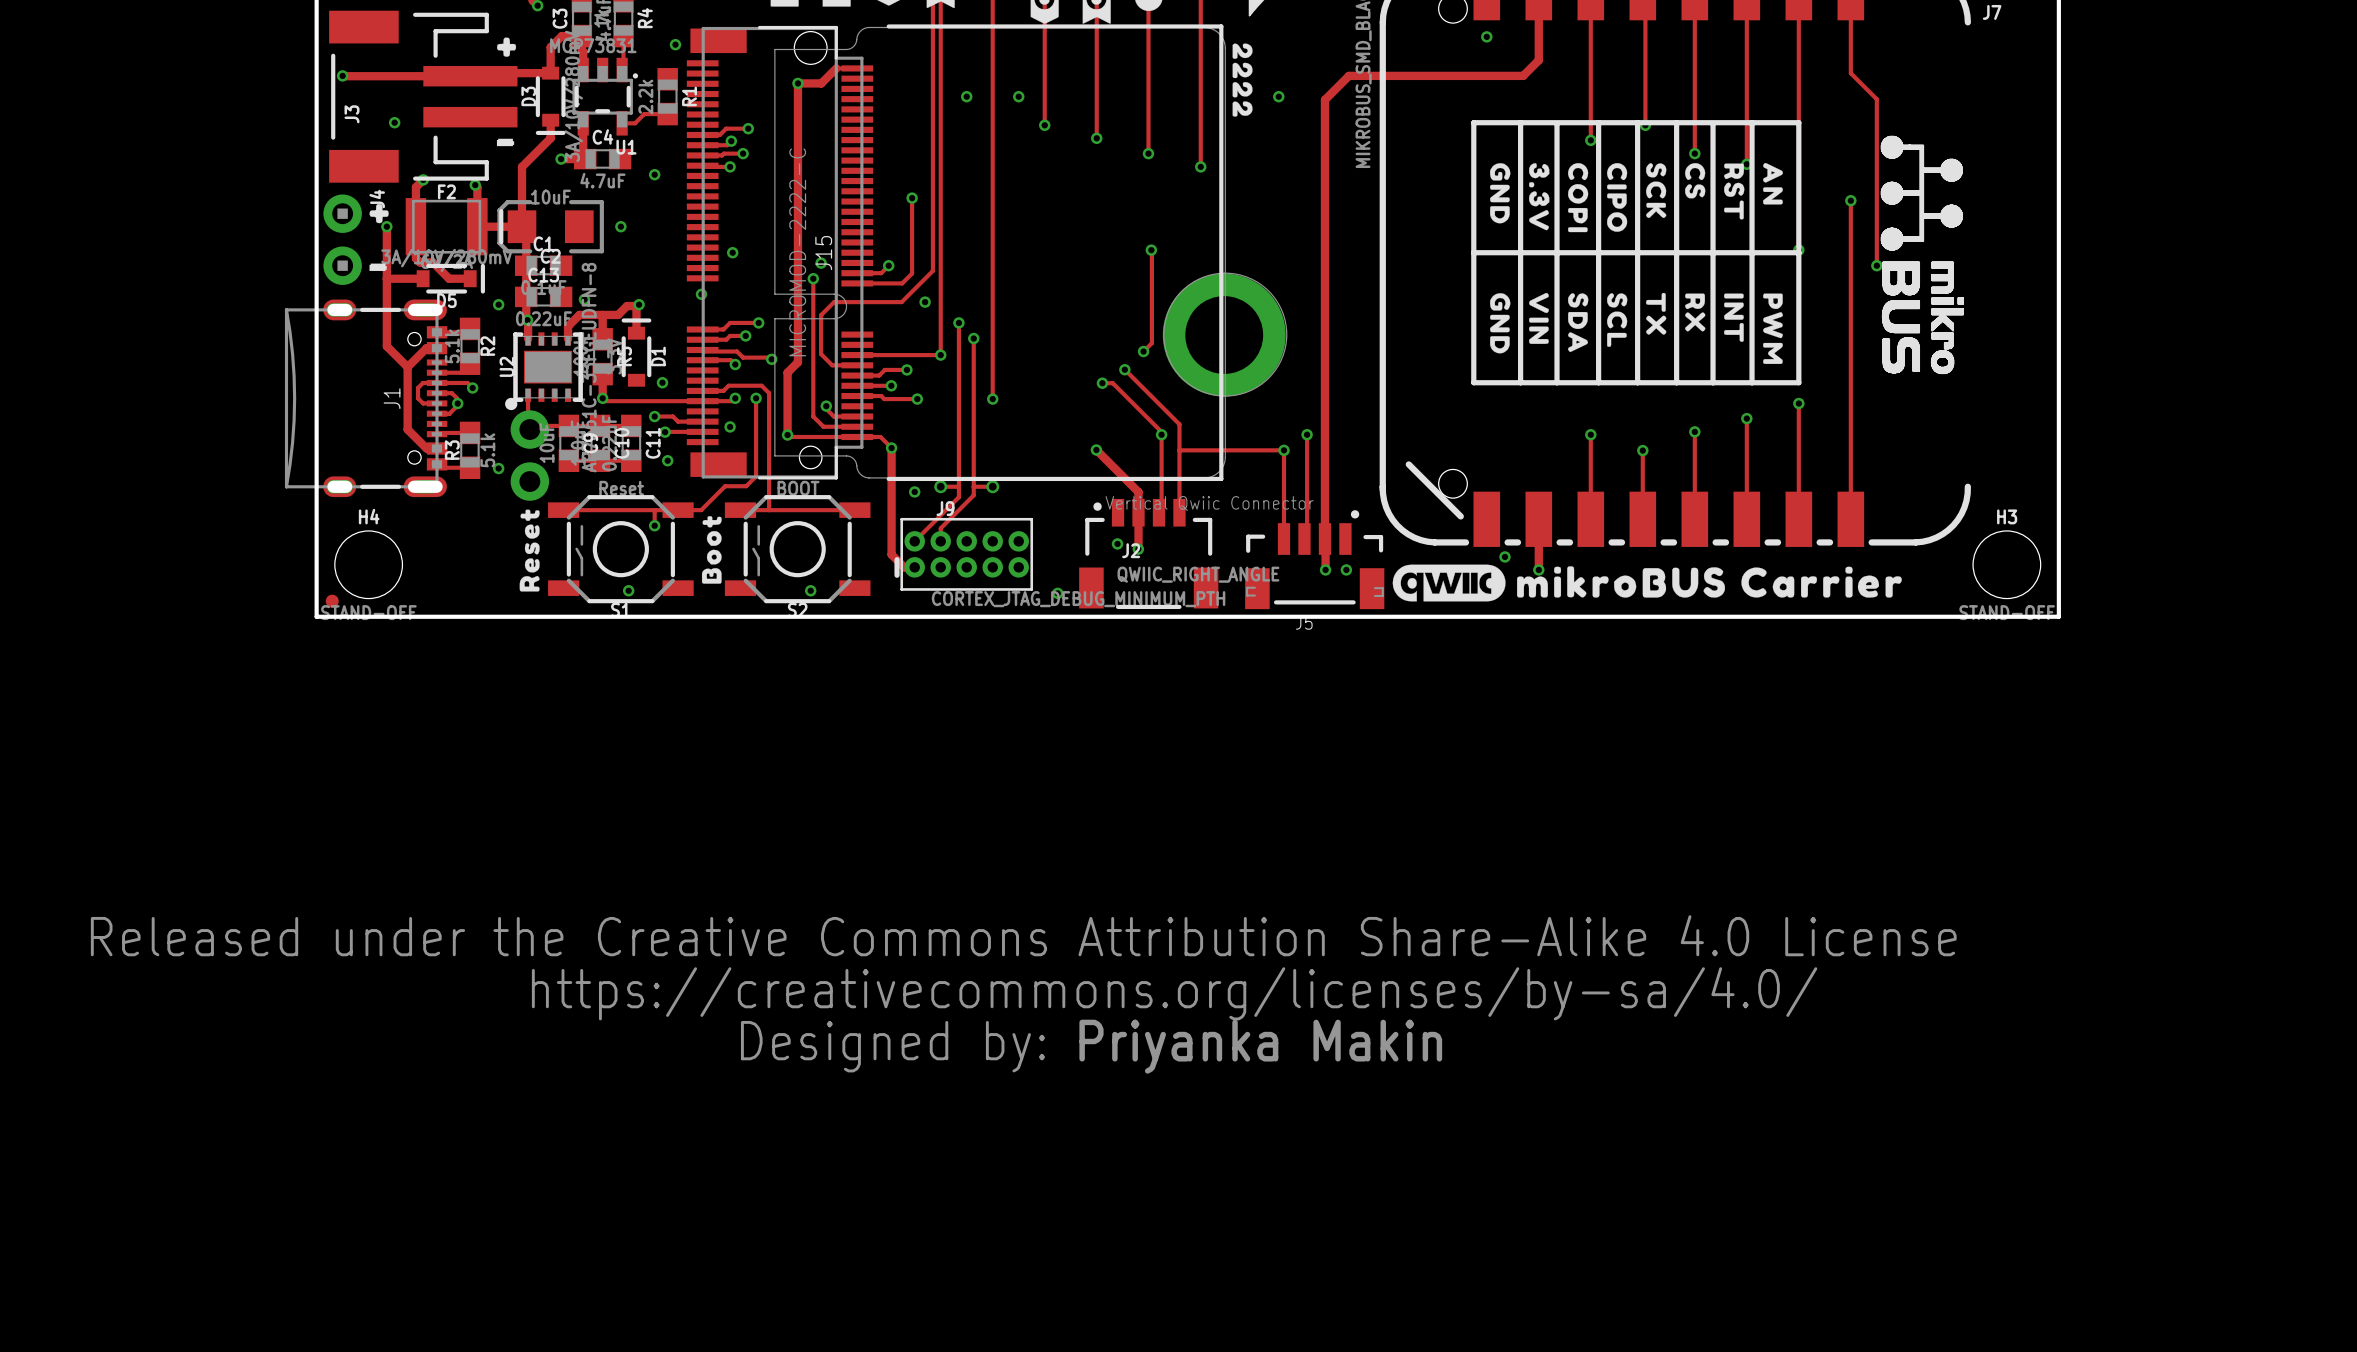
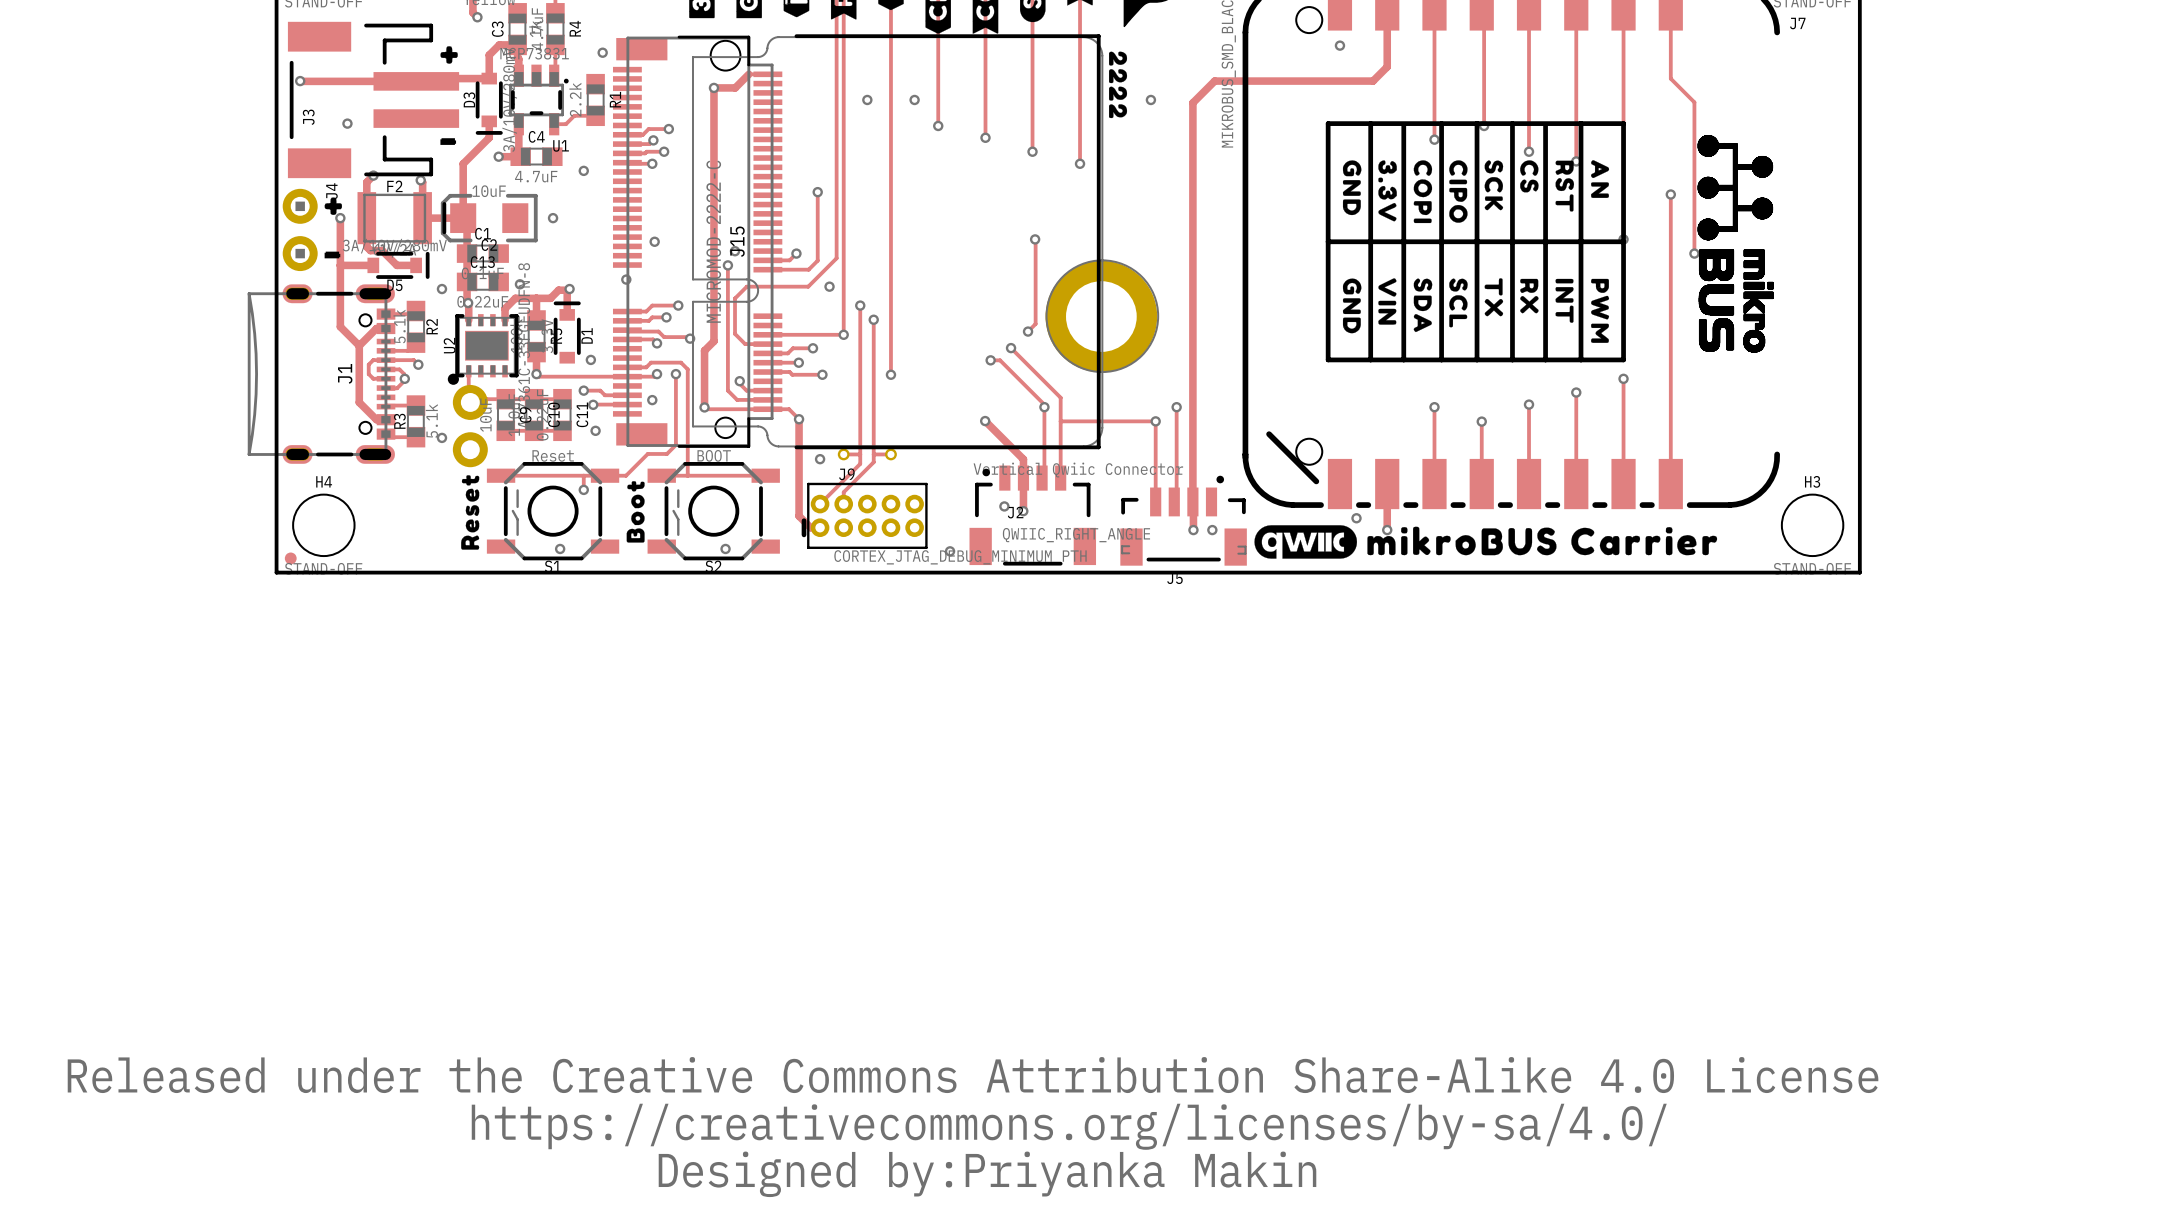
drawing position: (1023, 993) -> (973, 1127)
text position: Priyanka Makin (1260, 1046) -> Priyanka Makin (1140, 1174)

